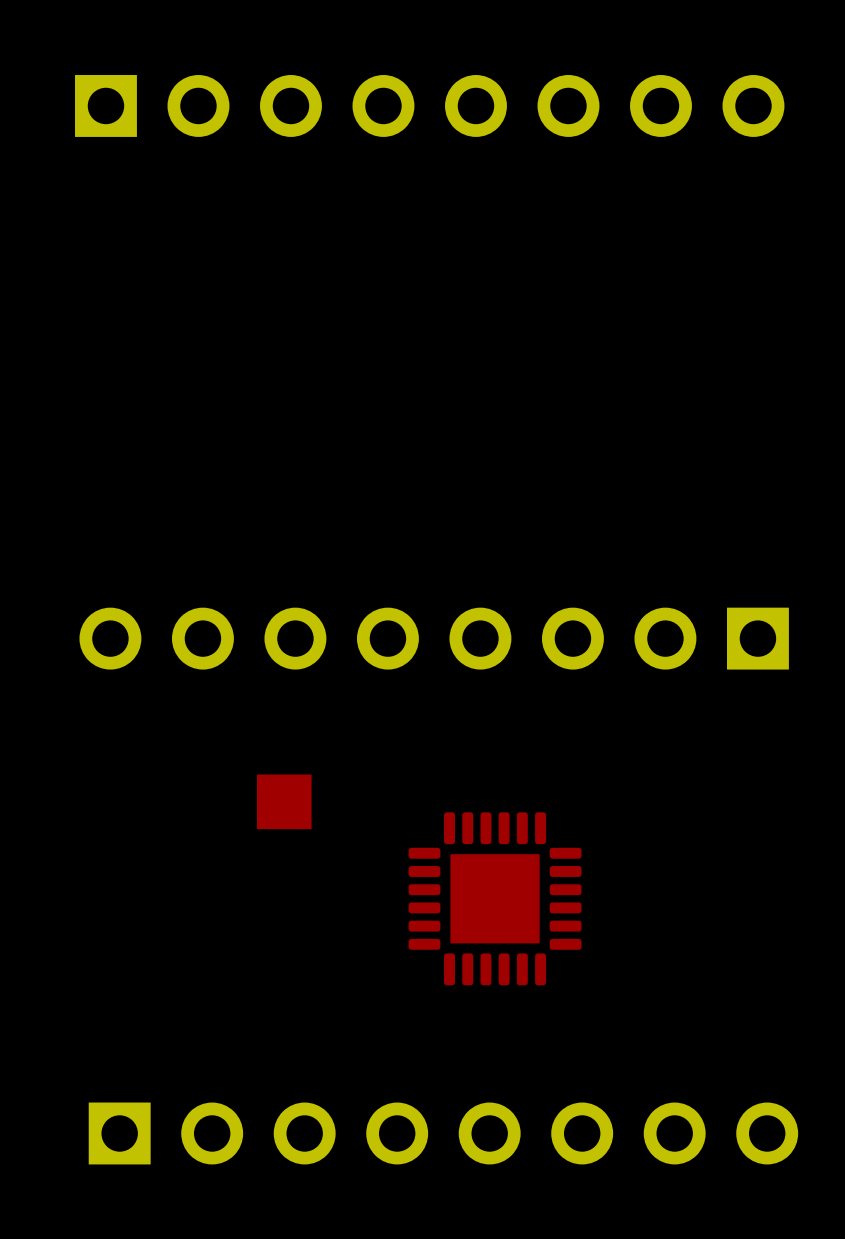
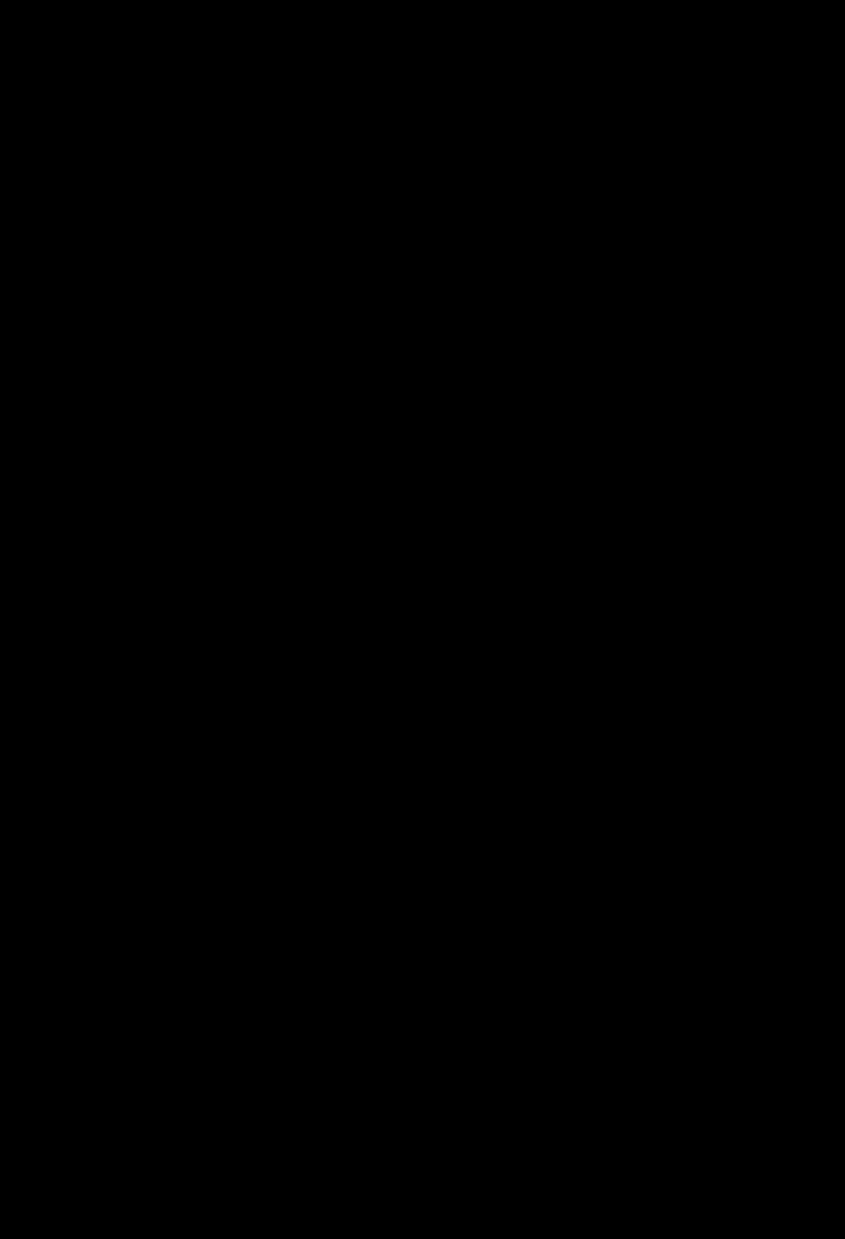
part: (429, 105) -> none
part: (434, 638) -> none
part: (284, 801) -> none
part: (495, 898) -> none
part: (443, 1133) -> none

